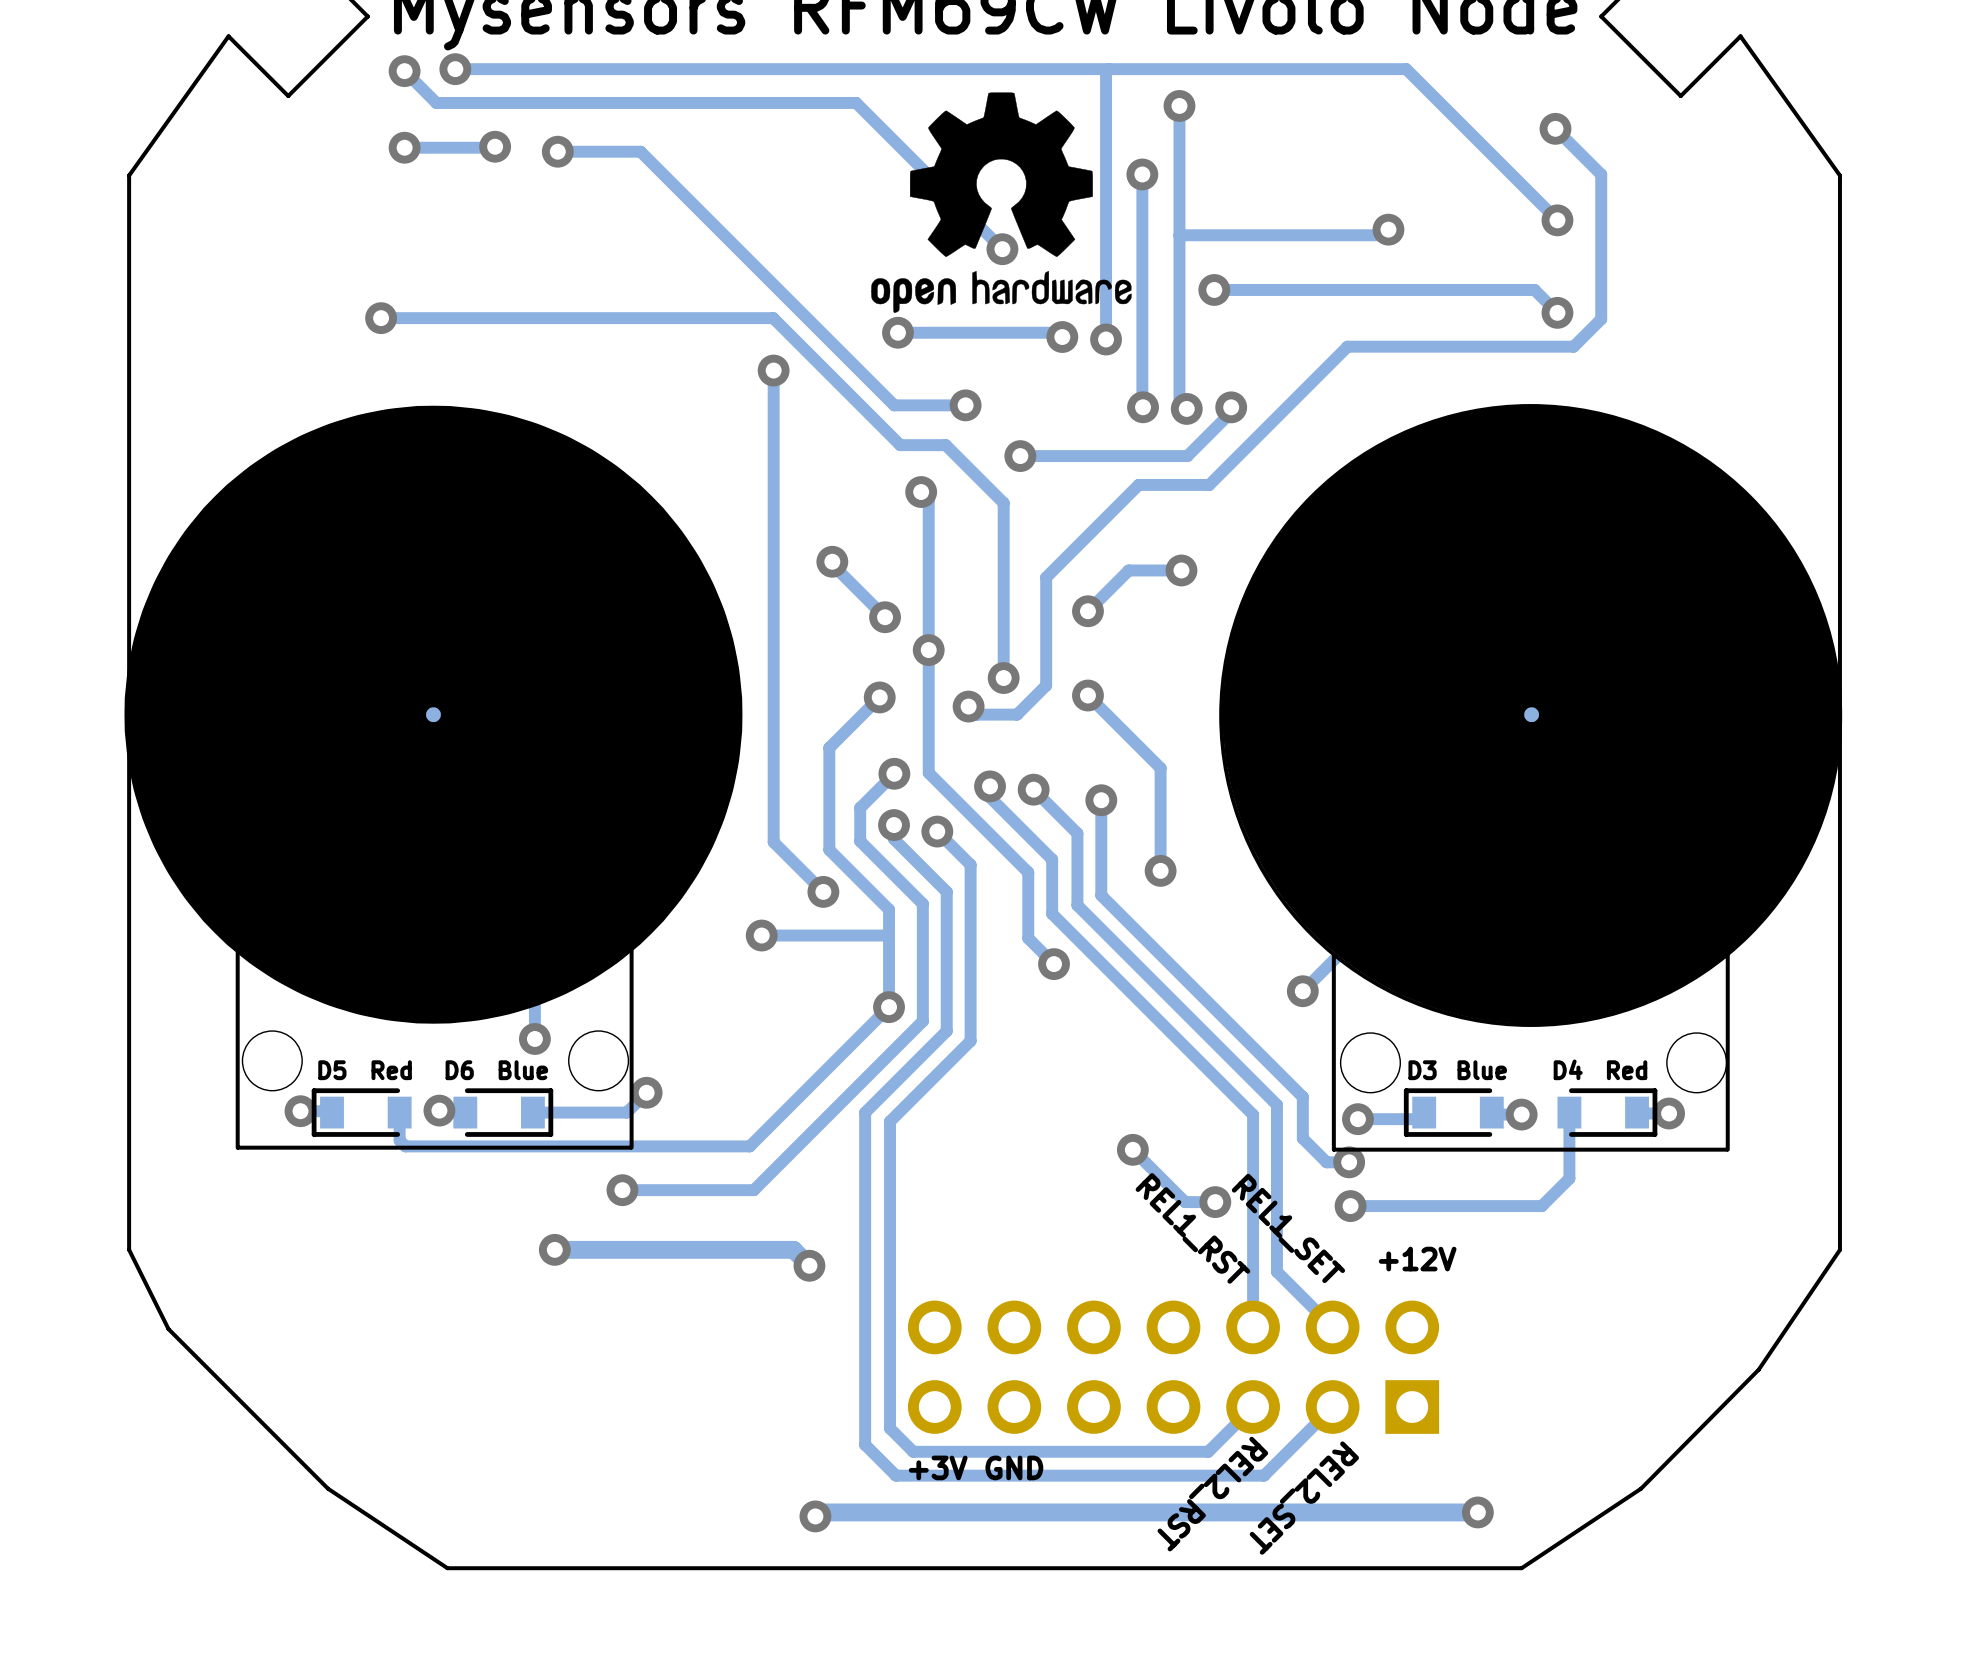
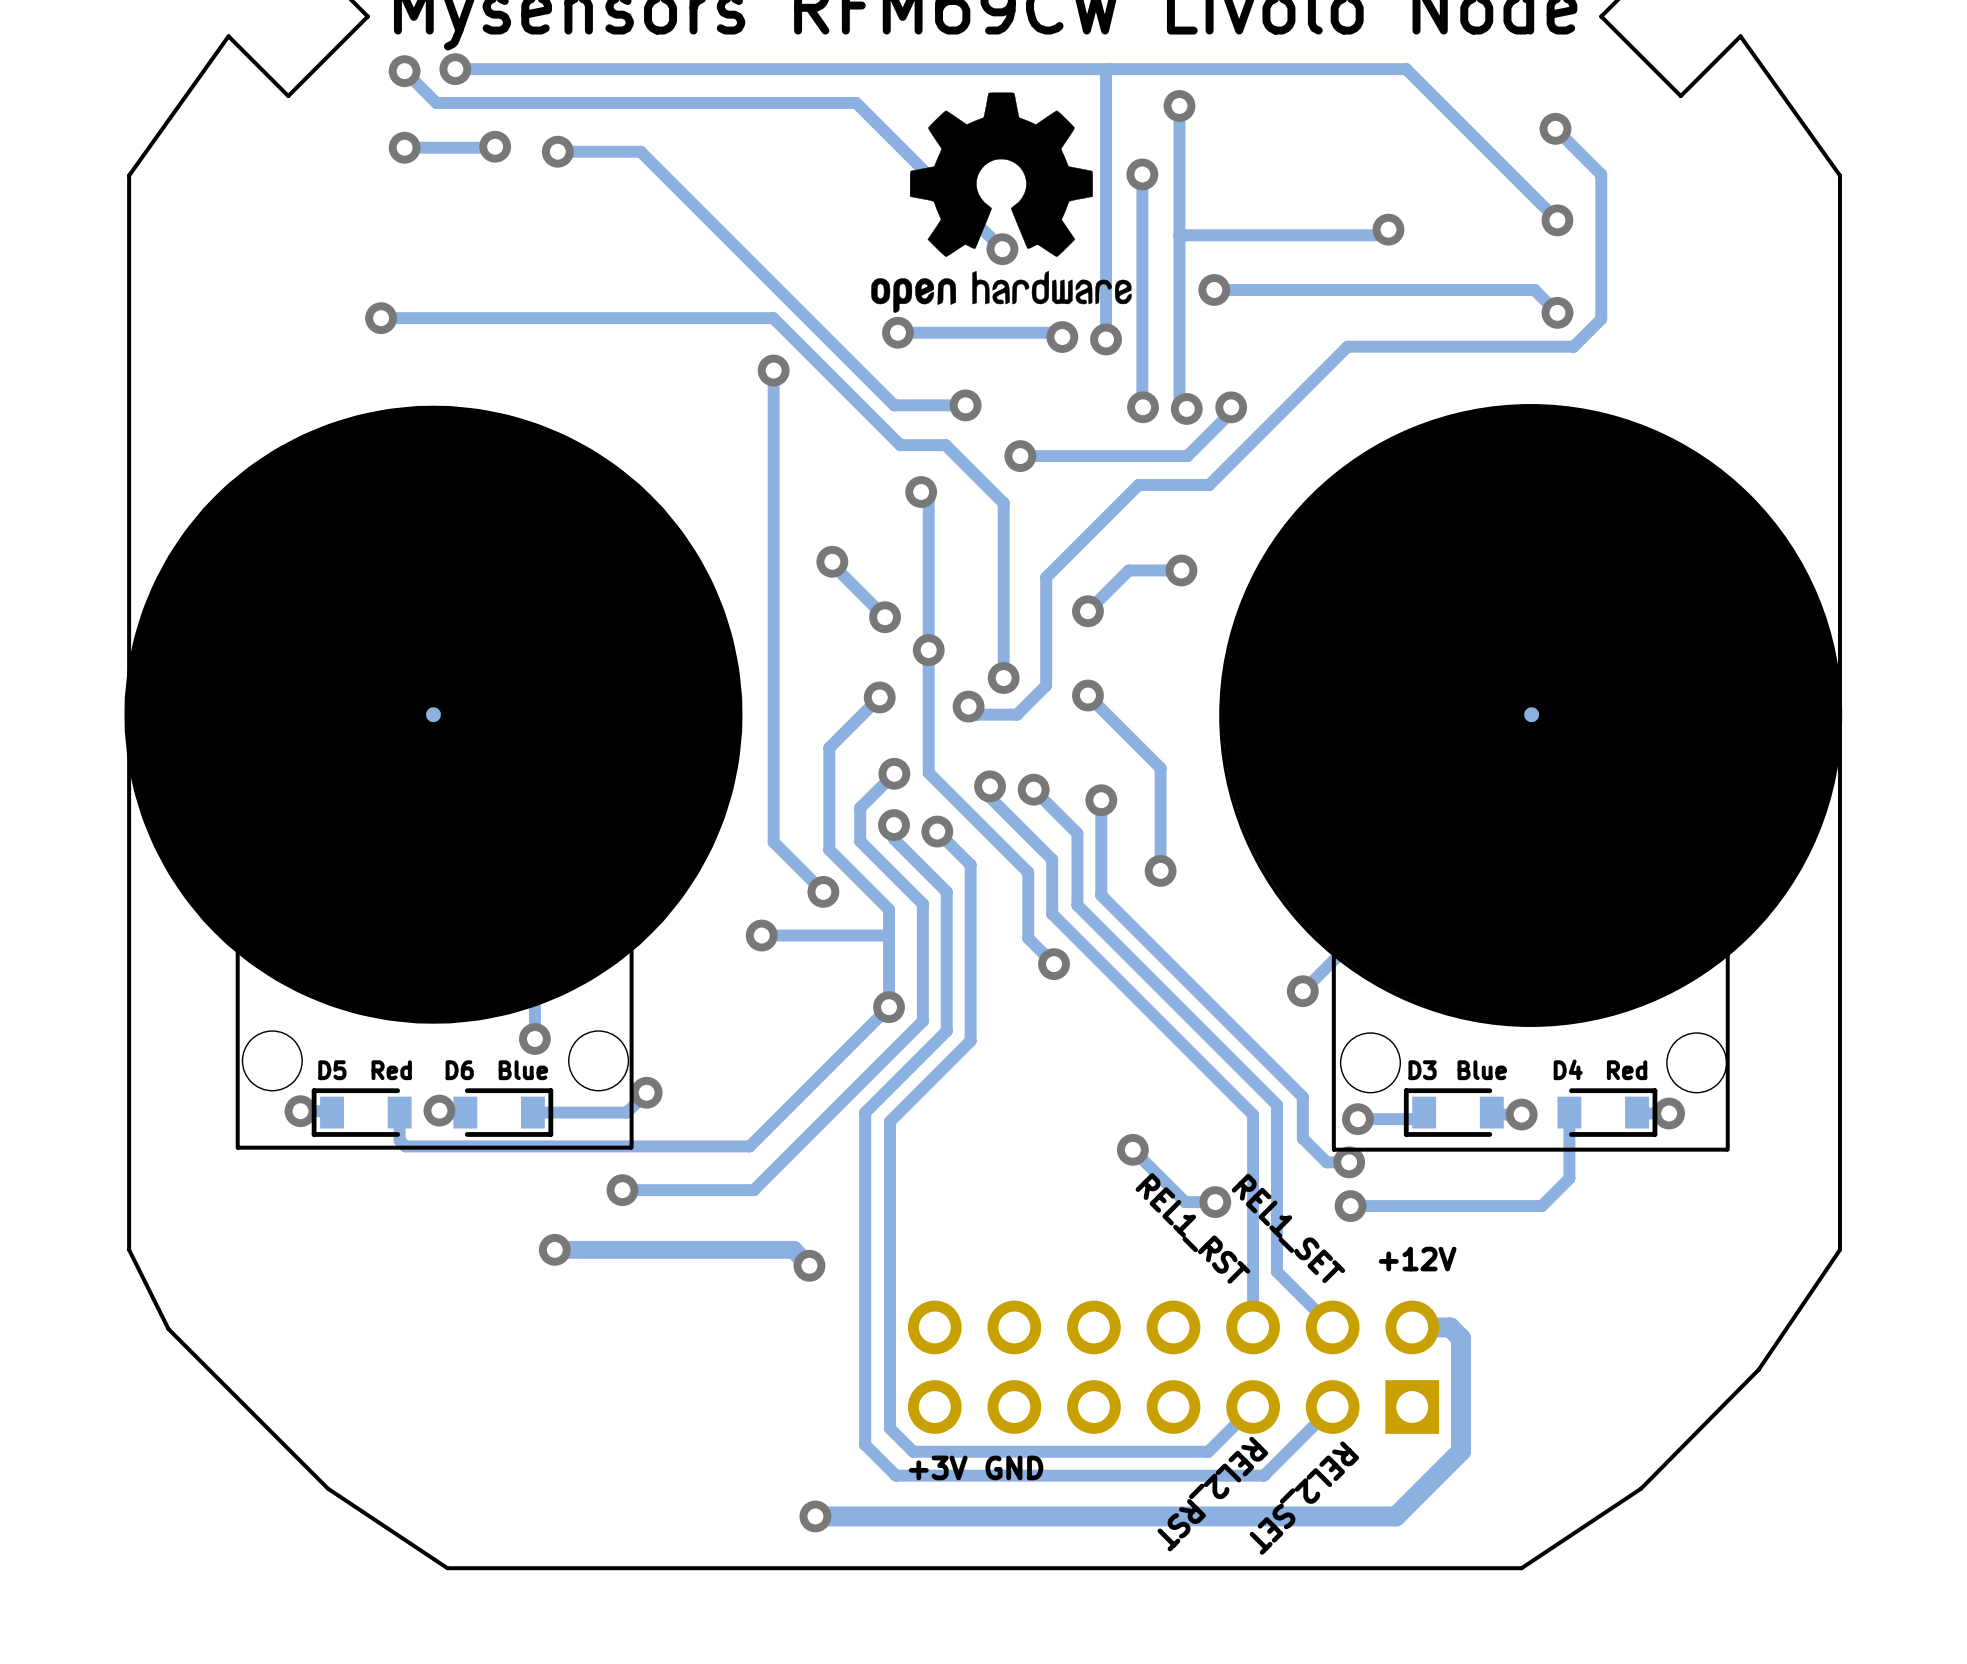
track: (1477, 1512) (819, 1512) (815, 1516) -> (1412, 1327) (1450, 1327) (1460, 1338) (1460, 1451) (1395, 1516) (815, 1516)
via: (1477, 1512) -> none

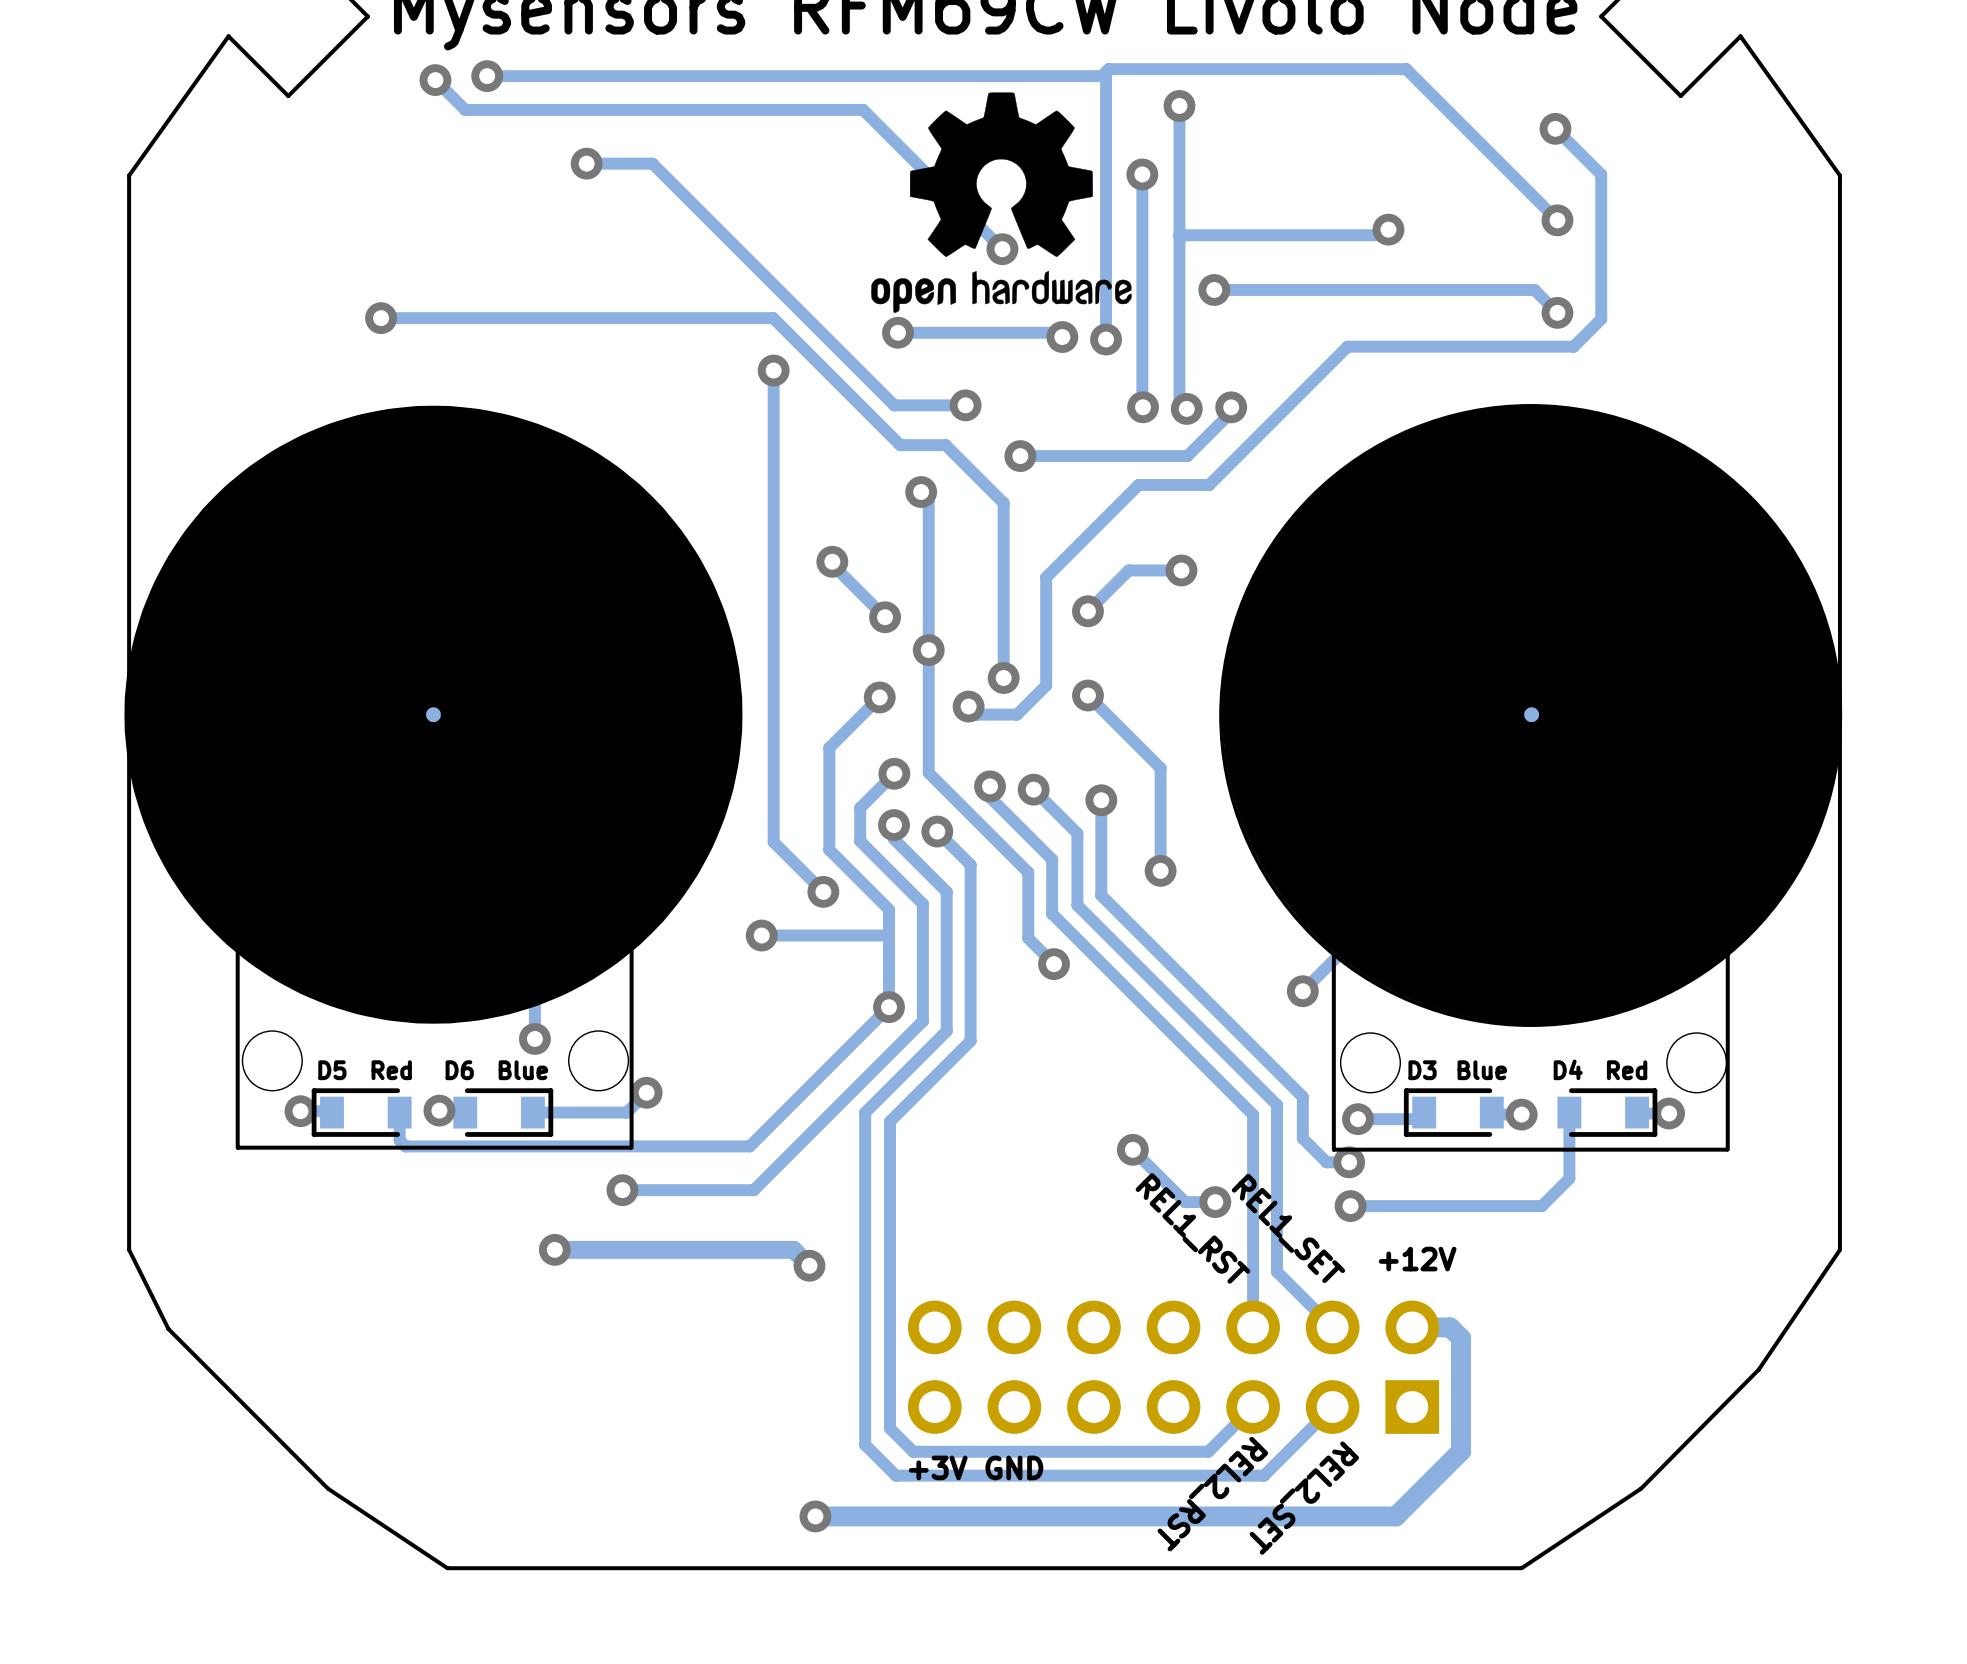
via: (455, 69) -> none
track: (1108, 69) (455, 69) -> none
track: (404, 71) (436, 102) (856, 102) (863, 109) -> (435, 80) (465, 109) (863, 109)
via: (404, 71) -> none
track: none -> (1106, 71) (1101, 76) (487, 76)
via: none -> (487, 76)
via: none -> (435, 80)
track: (495, 146) (404, 147) -> none
via: (495, 146) -> none
via: (404, 147) -> none
track: (557, 151) (640, 151) (652, 163) -> (586, 163) (652, 163)
via position: (557, 151) -> (586, 163)

